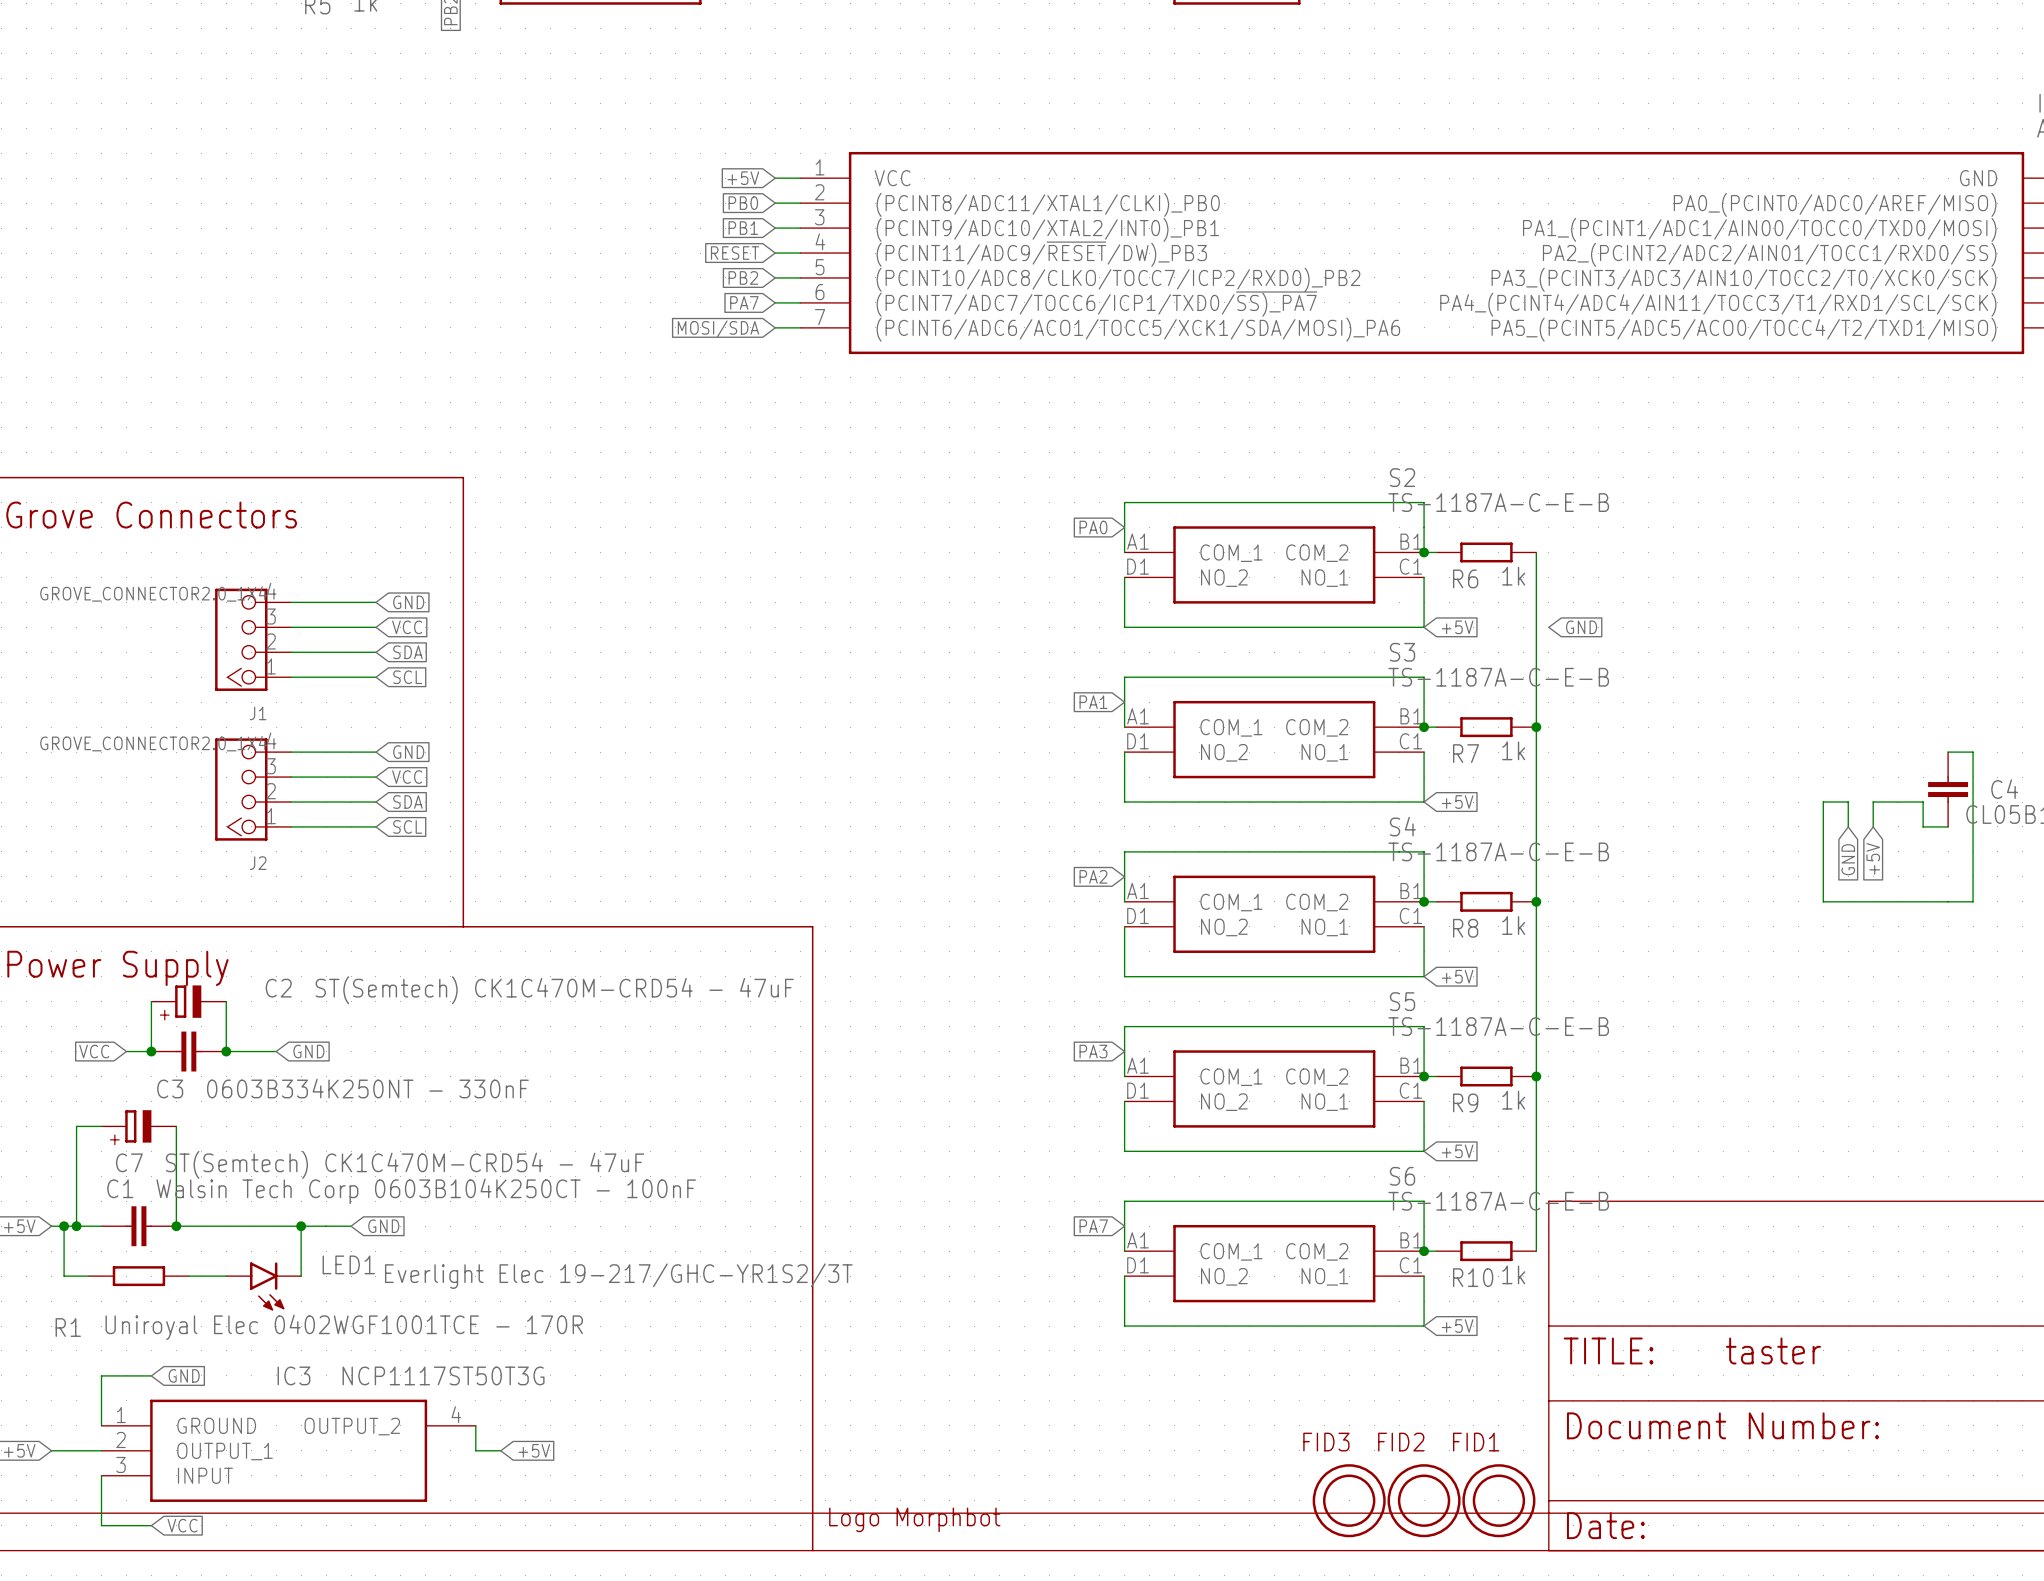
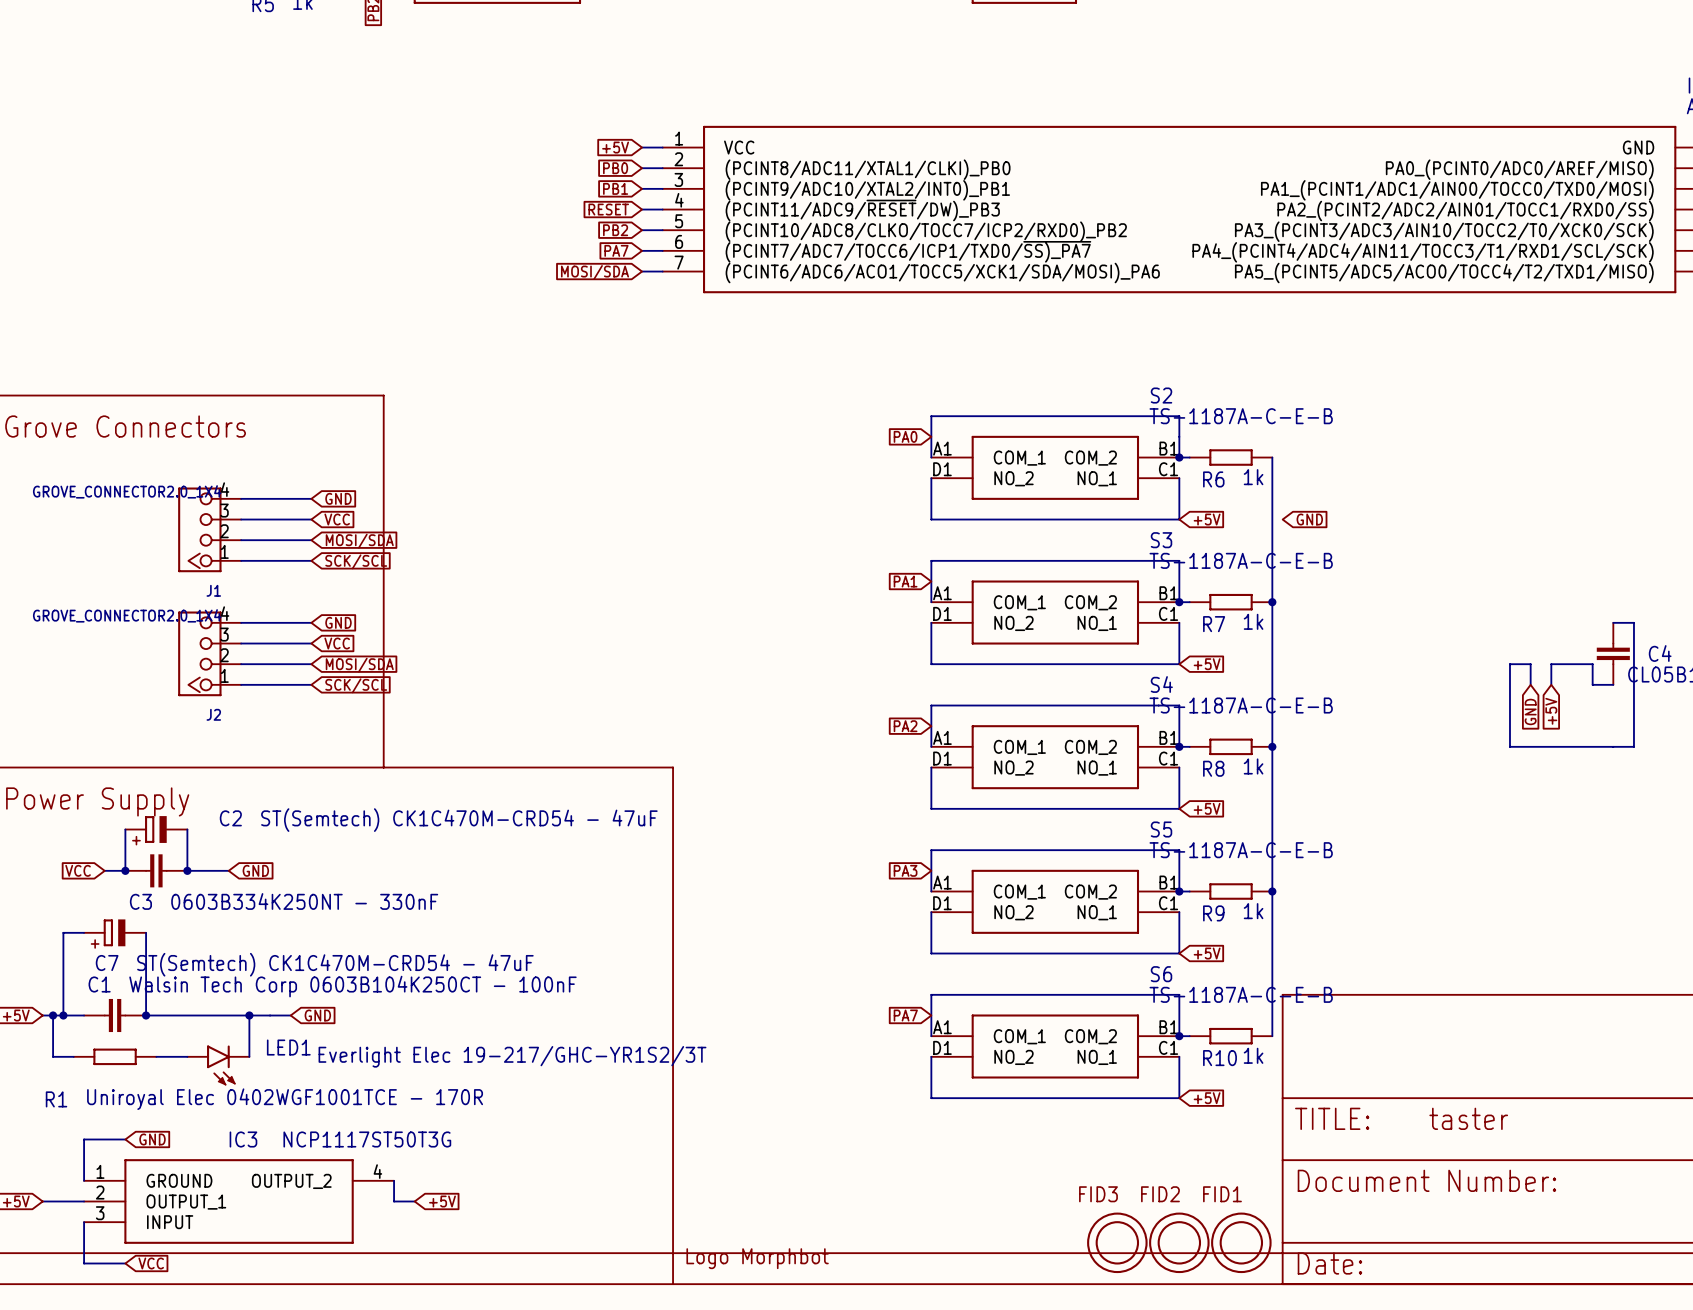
global label: SDA (407, 652) -> MOSI/SDA (359, 541)
global label: SCL (407, 677) -> SCK/SCL (356, 561)
global label: SDA (407, 802) -> MOSI/SDA (359, 665)
global label: SCL (407, 826) -> SCK/SCL (356, 685)

